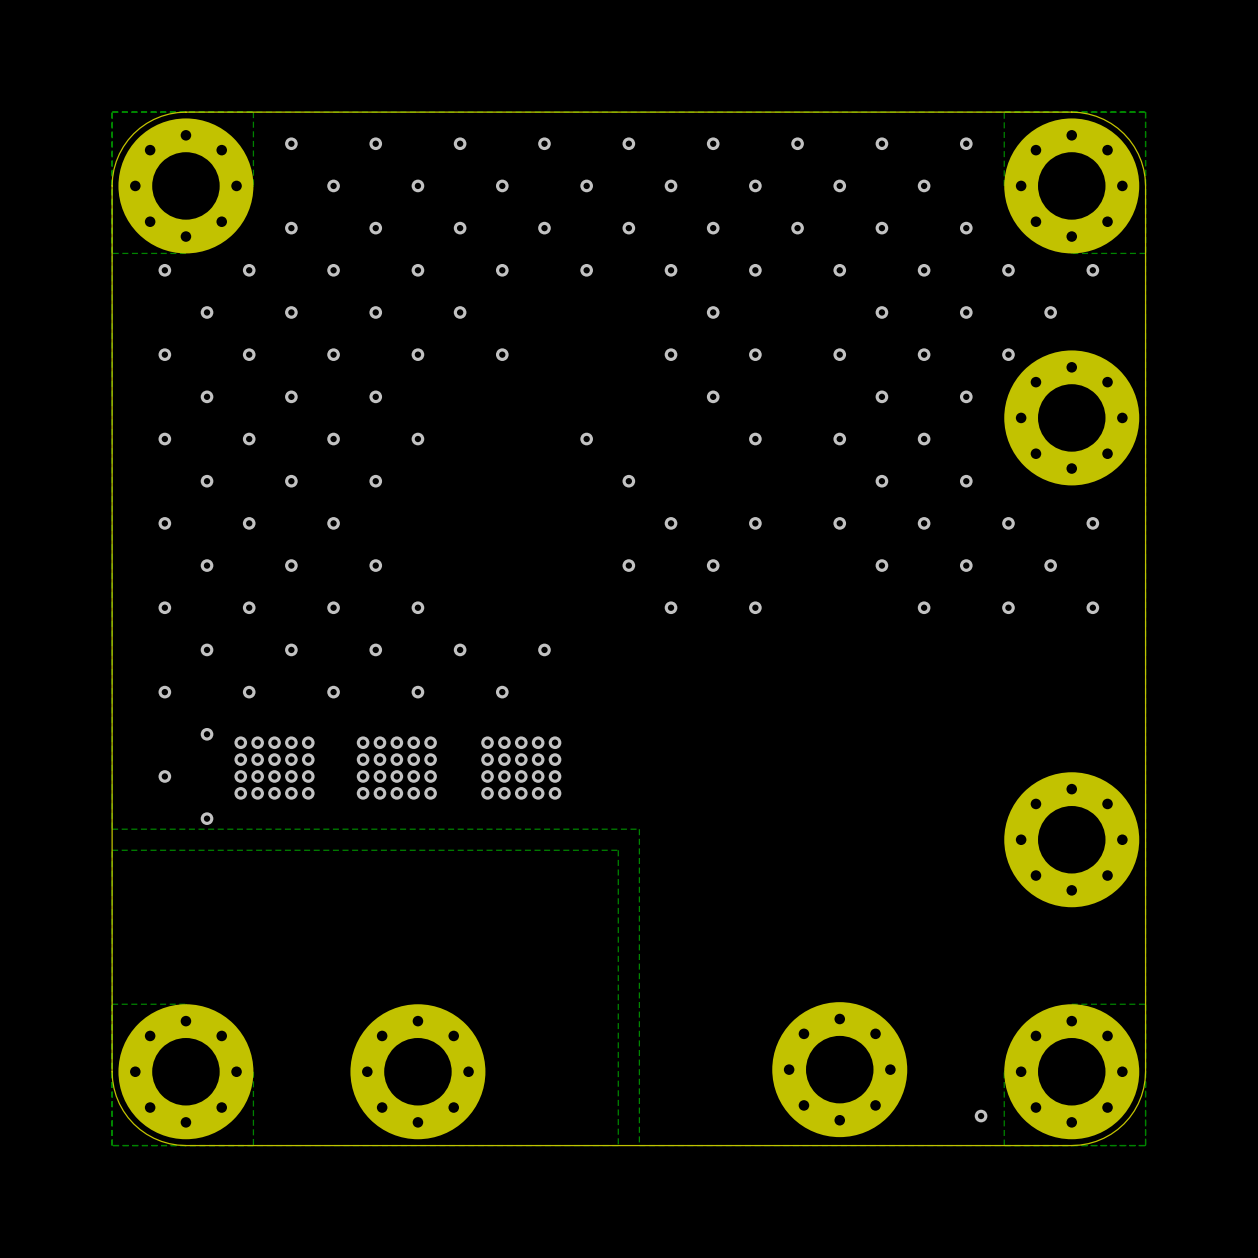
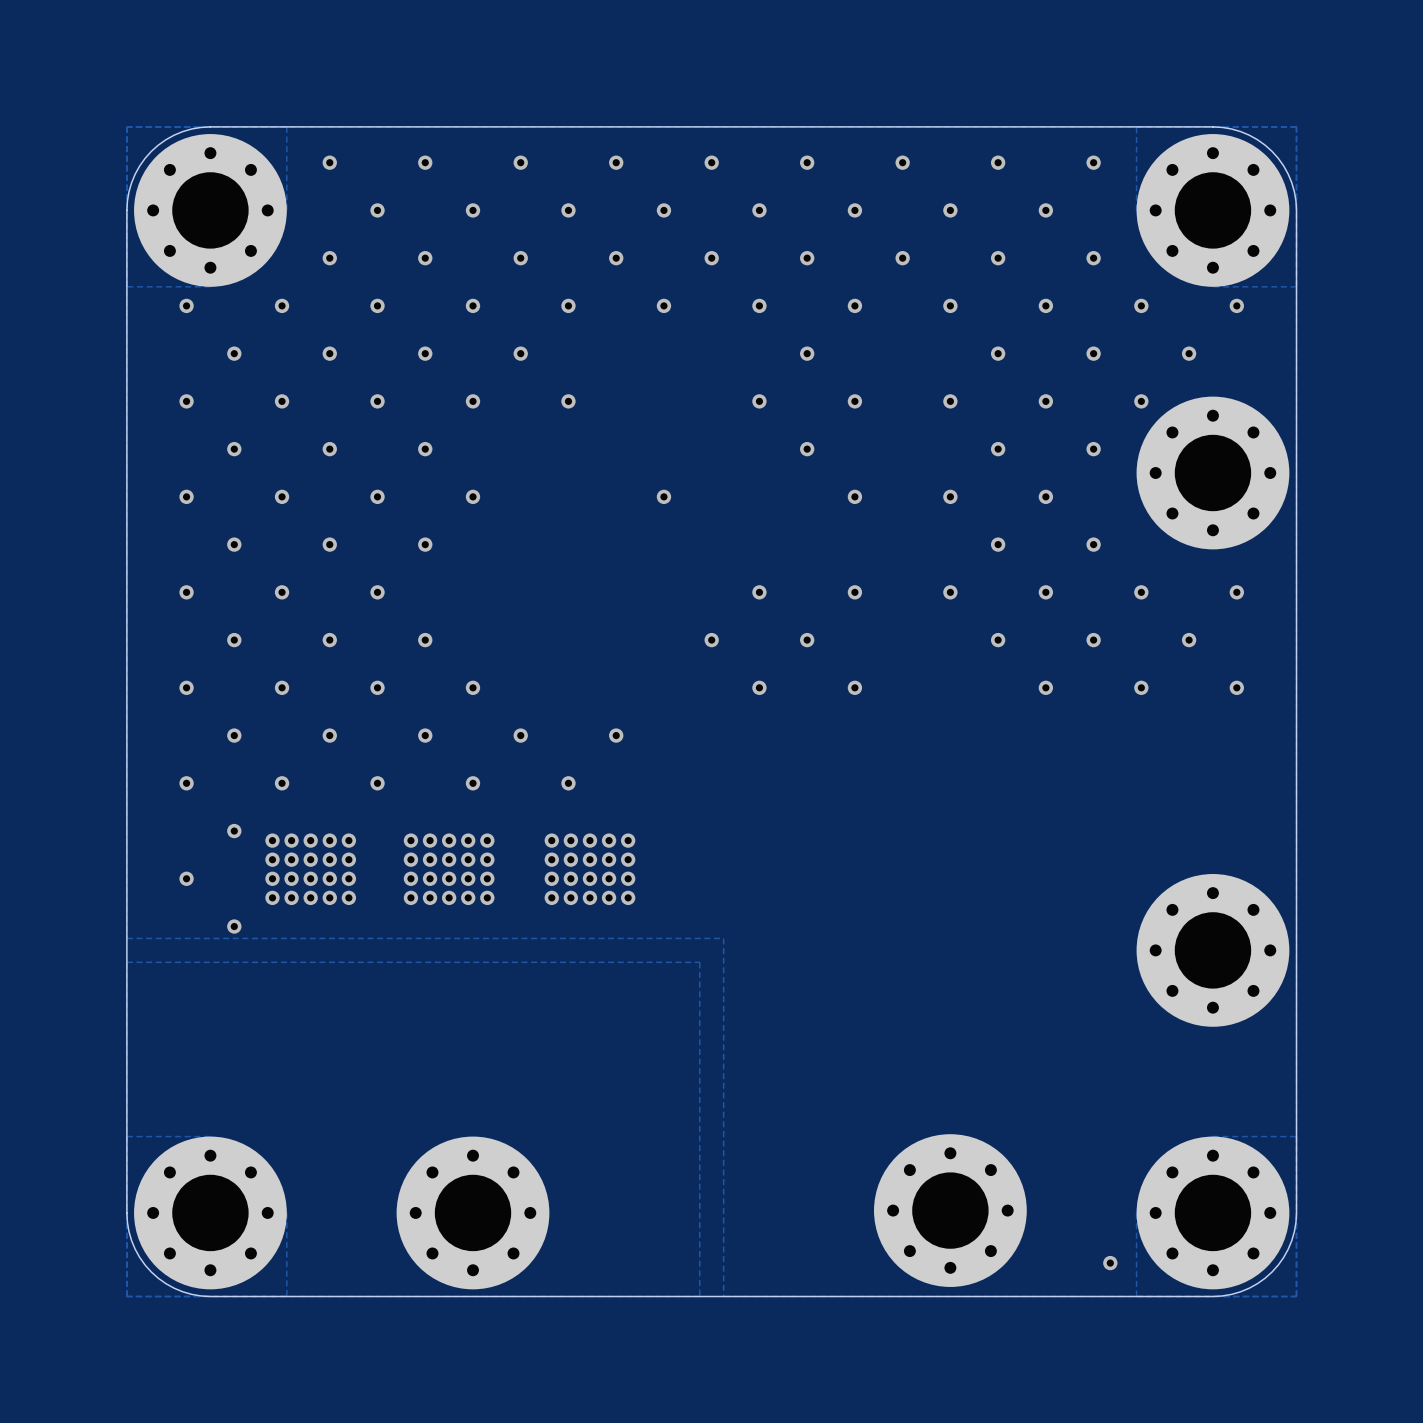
via: (628, 481) -> none

